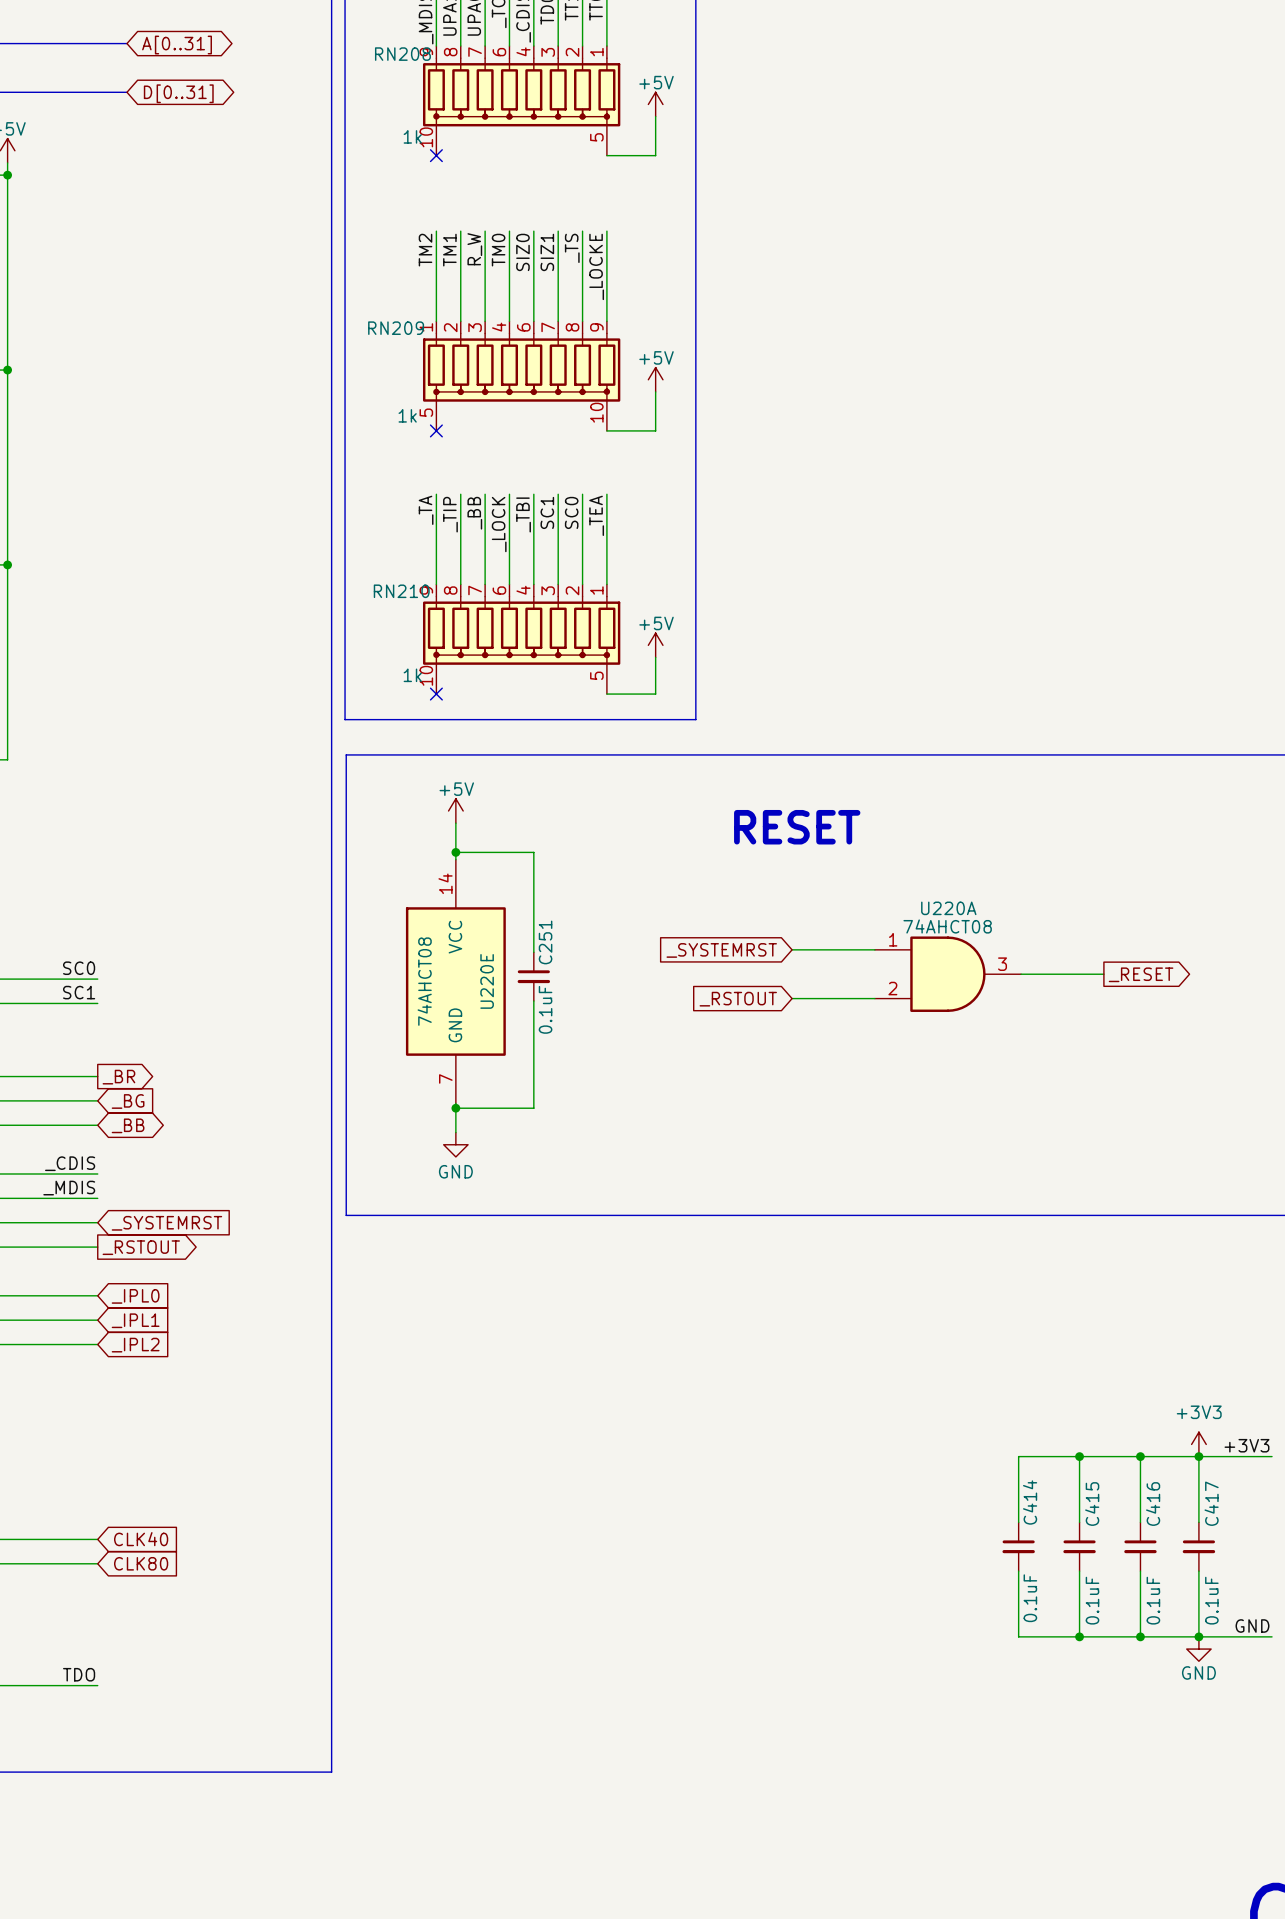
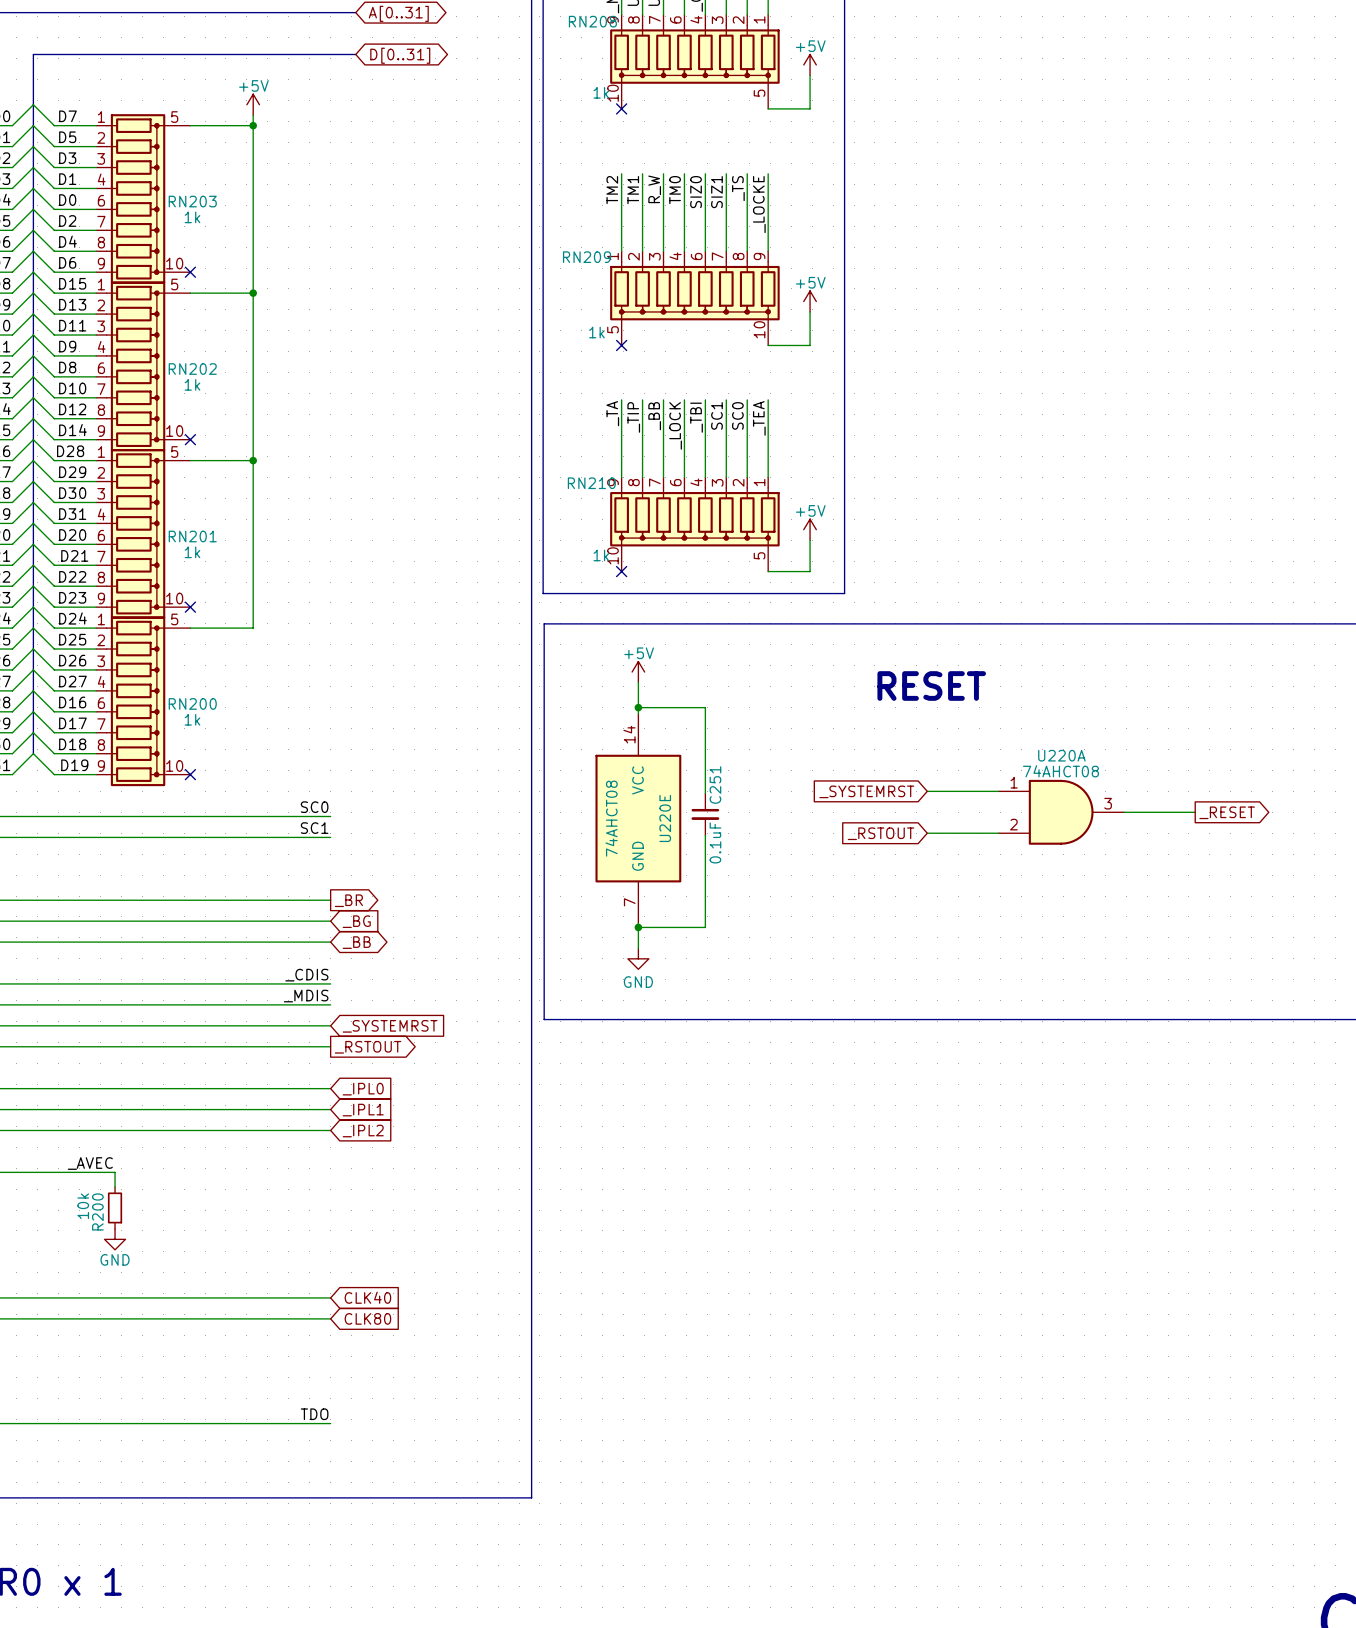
power symbol: +3V3 (1198, 1444) -> none
label: +3V3 (1246, 1445) -> none
wire: (1079, 1456) (1079, 1522) -> none
junction: (1079, 1456) -> none
wire: (1140, 1456) (1140, 1522) -> none
junction: (1140, 1456) -> none
wire: (1198, 1456) (1198, 1522) -> none
junction: (1198, 1456) -> none
wire: (1272, 1456) (1018, 1456) (1018, 1522) -> none
C414: 0.1uF (1018, 1546) -> none
C415: 0.1uF (1079, 1546) -> none
C416: 0.1uF (1140, 1546) -> none
C417: 0.1uF (1198, 1546) -> none
wire: (1018, 1571) (1018, 1636) (1272, 1636) -> none
wire: (1079, 1571) (1079, 1636) -> none
wire: (1140, 1571) (1140, 1636) -> none
wire: (1198, 1571) (1198, 1636) -> none
label: GND (1252, 1626) -> none
junction: (1079, 1636) -> none
junction: (1140, 1636) -> none
junction: (1198, 1636) -> none
power symbol: GND (1198, 1649) -> none

